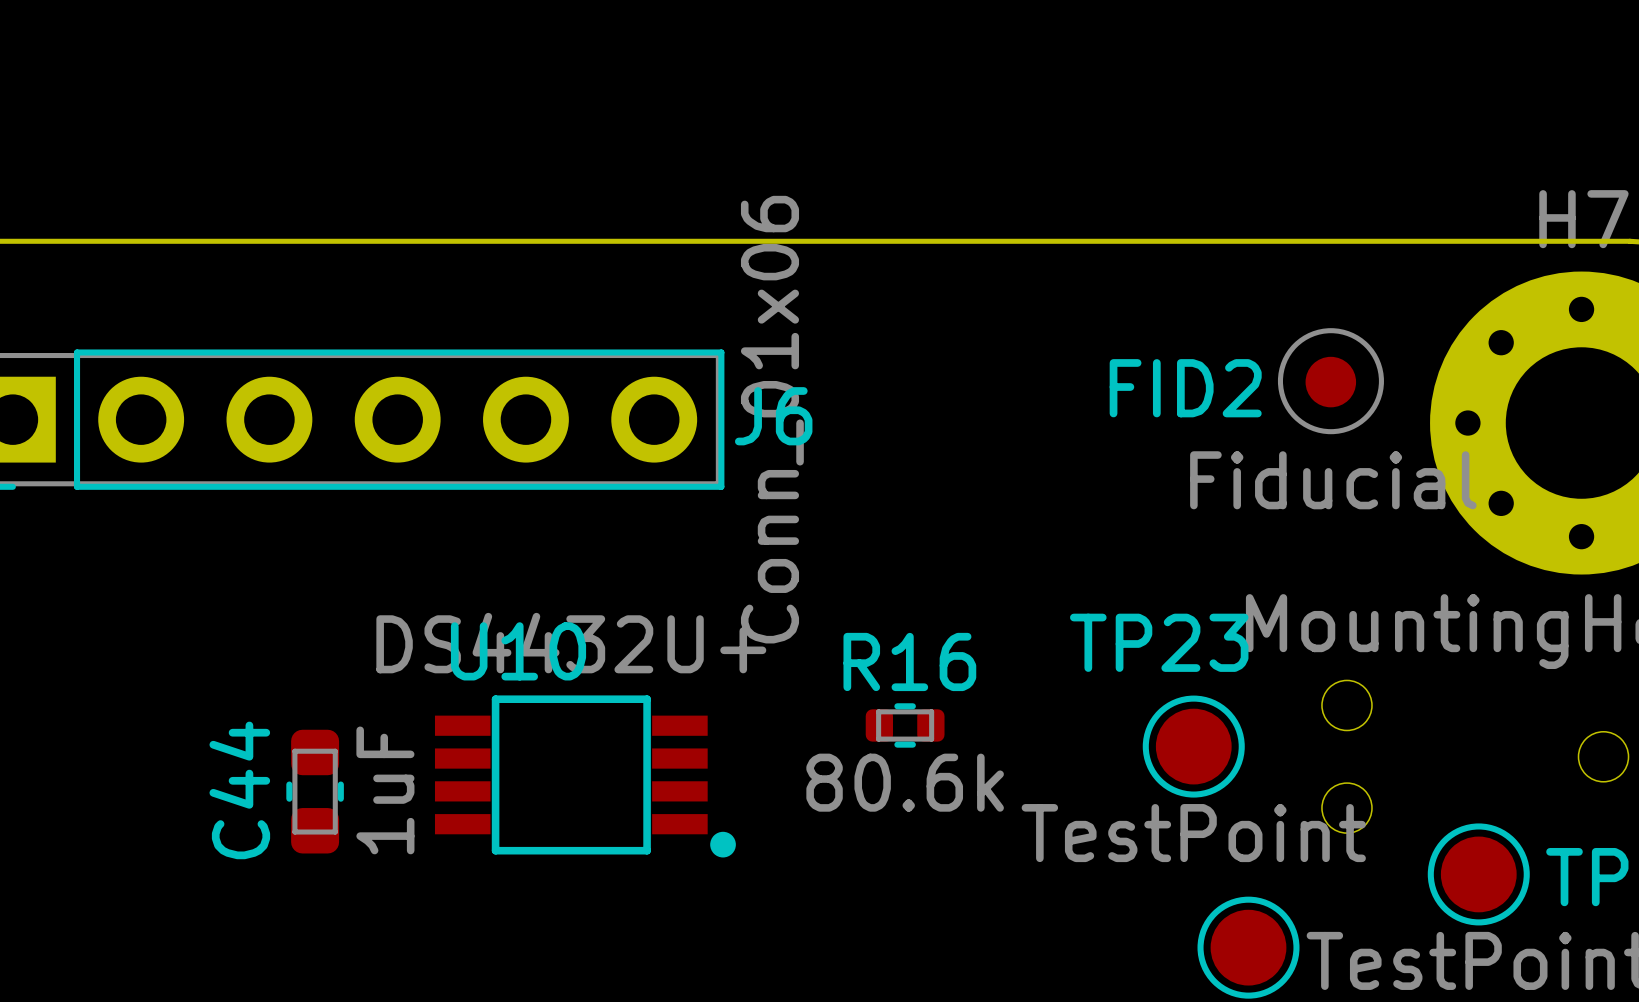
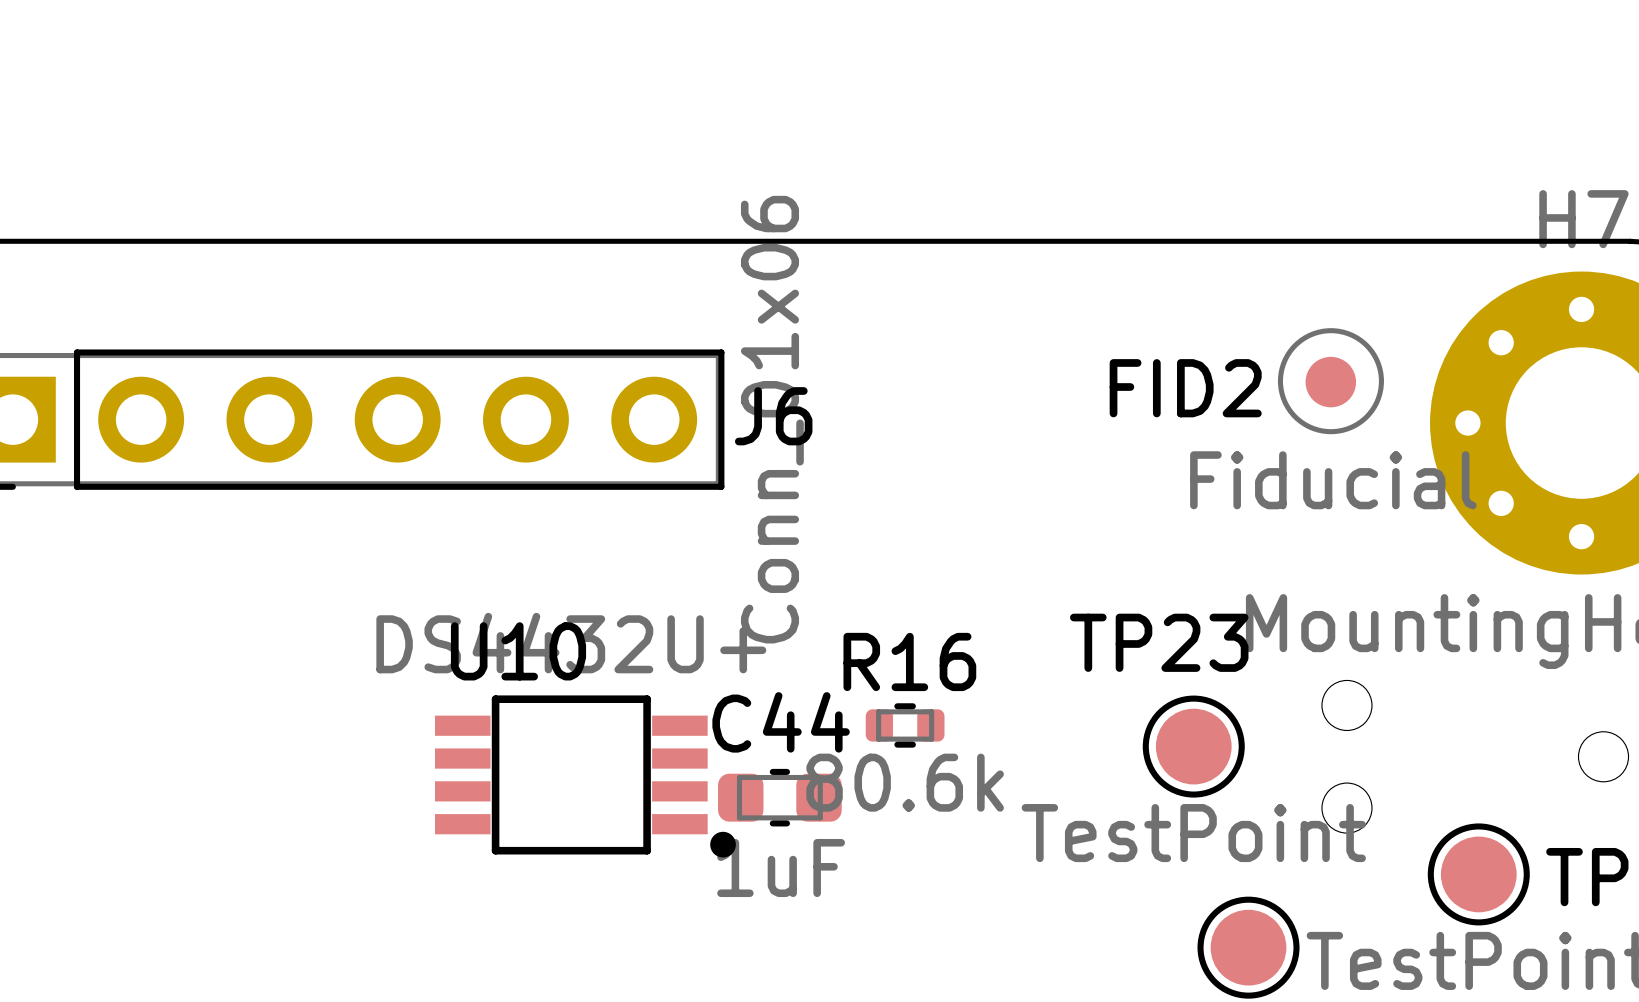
C44 rotation: 0° (315, 791) -> 90° clockwise (779, 797)
C44 position: (315, 791) -> (779, 797)

